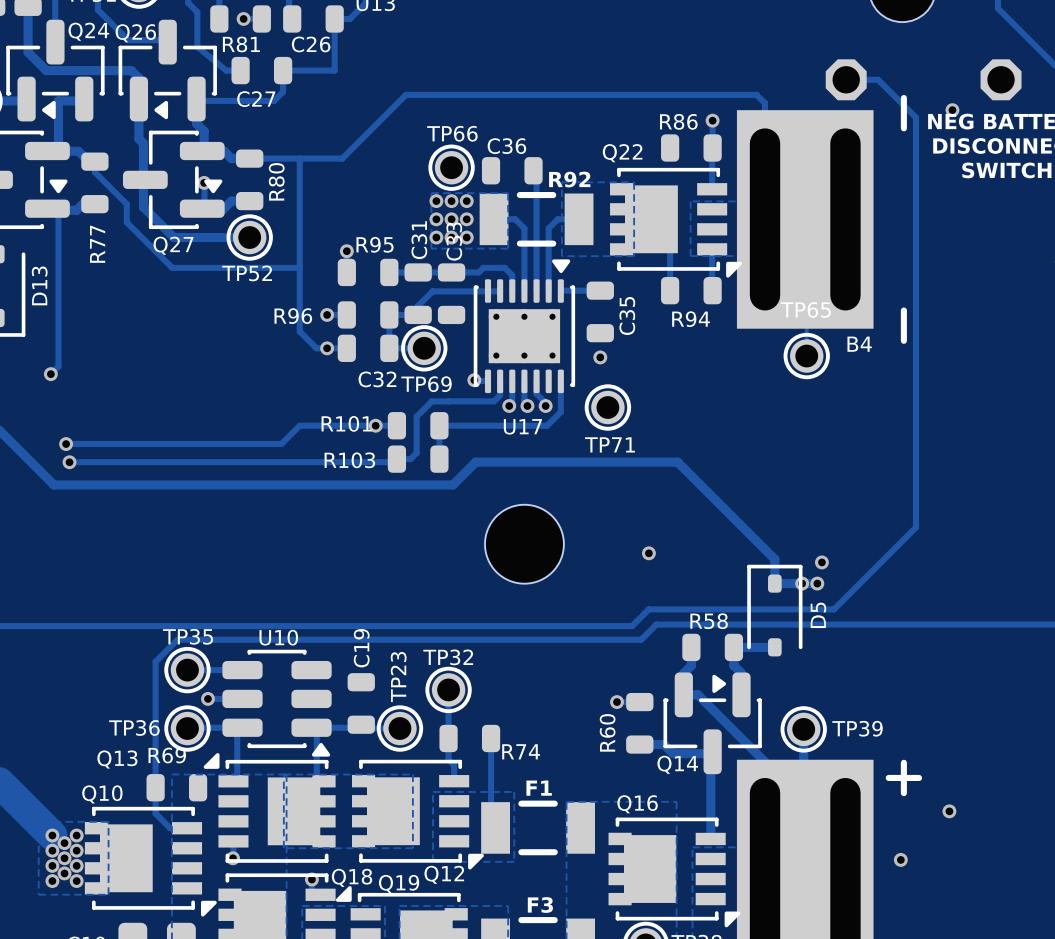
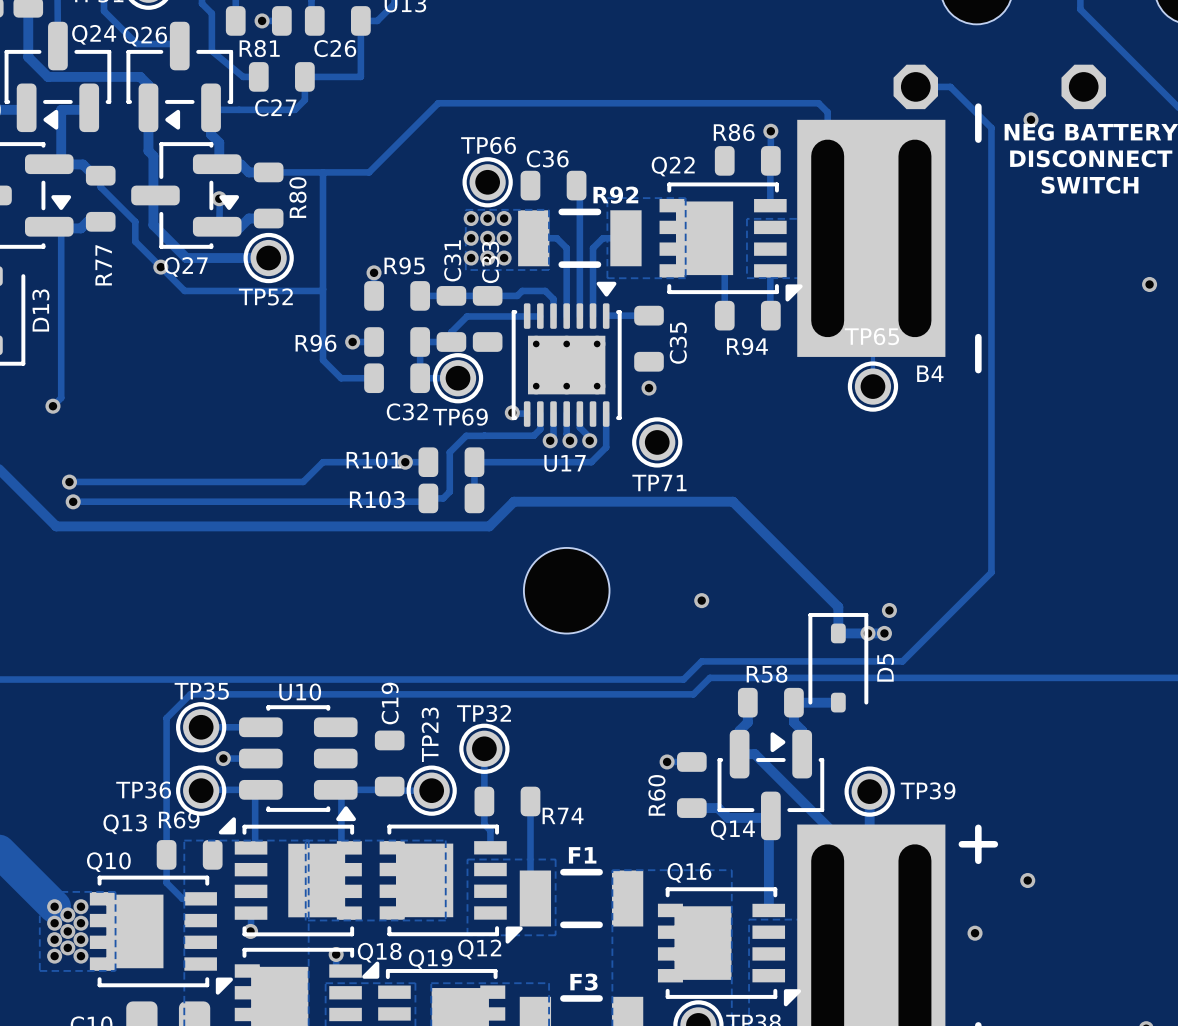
via: none -> (160, 267)
via: (327, 348) -> none

